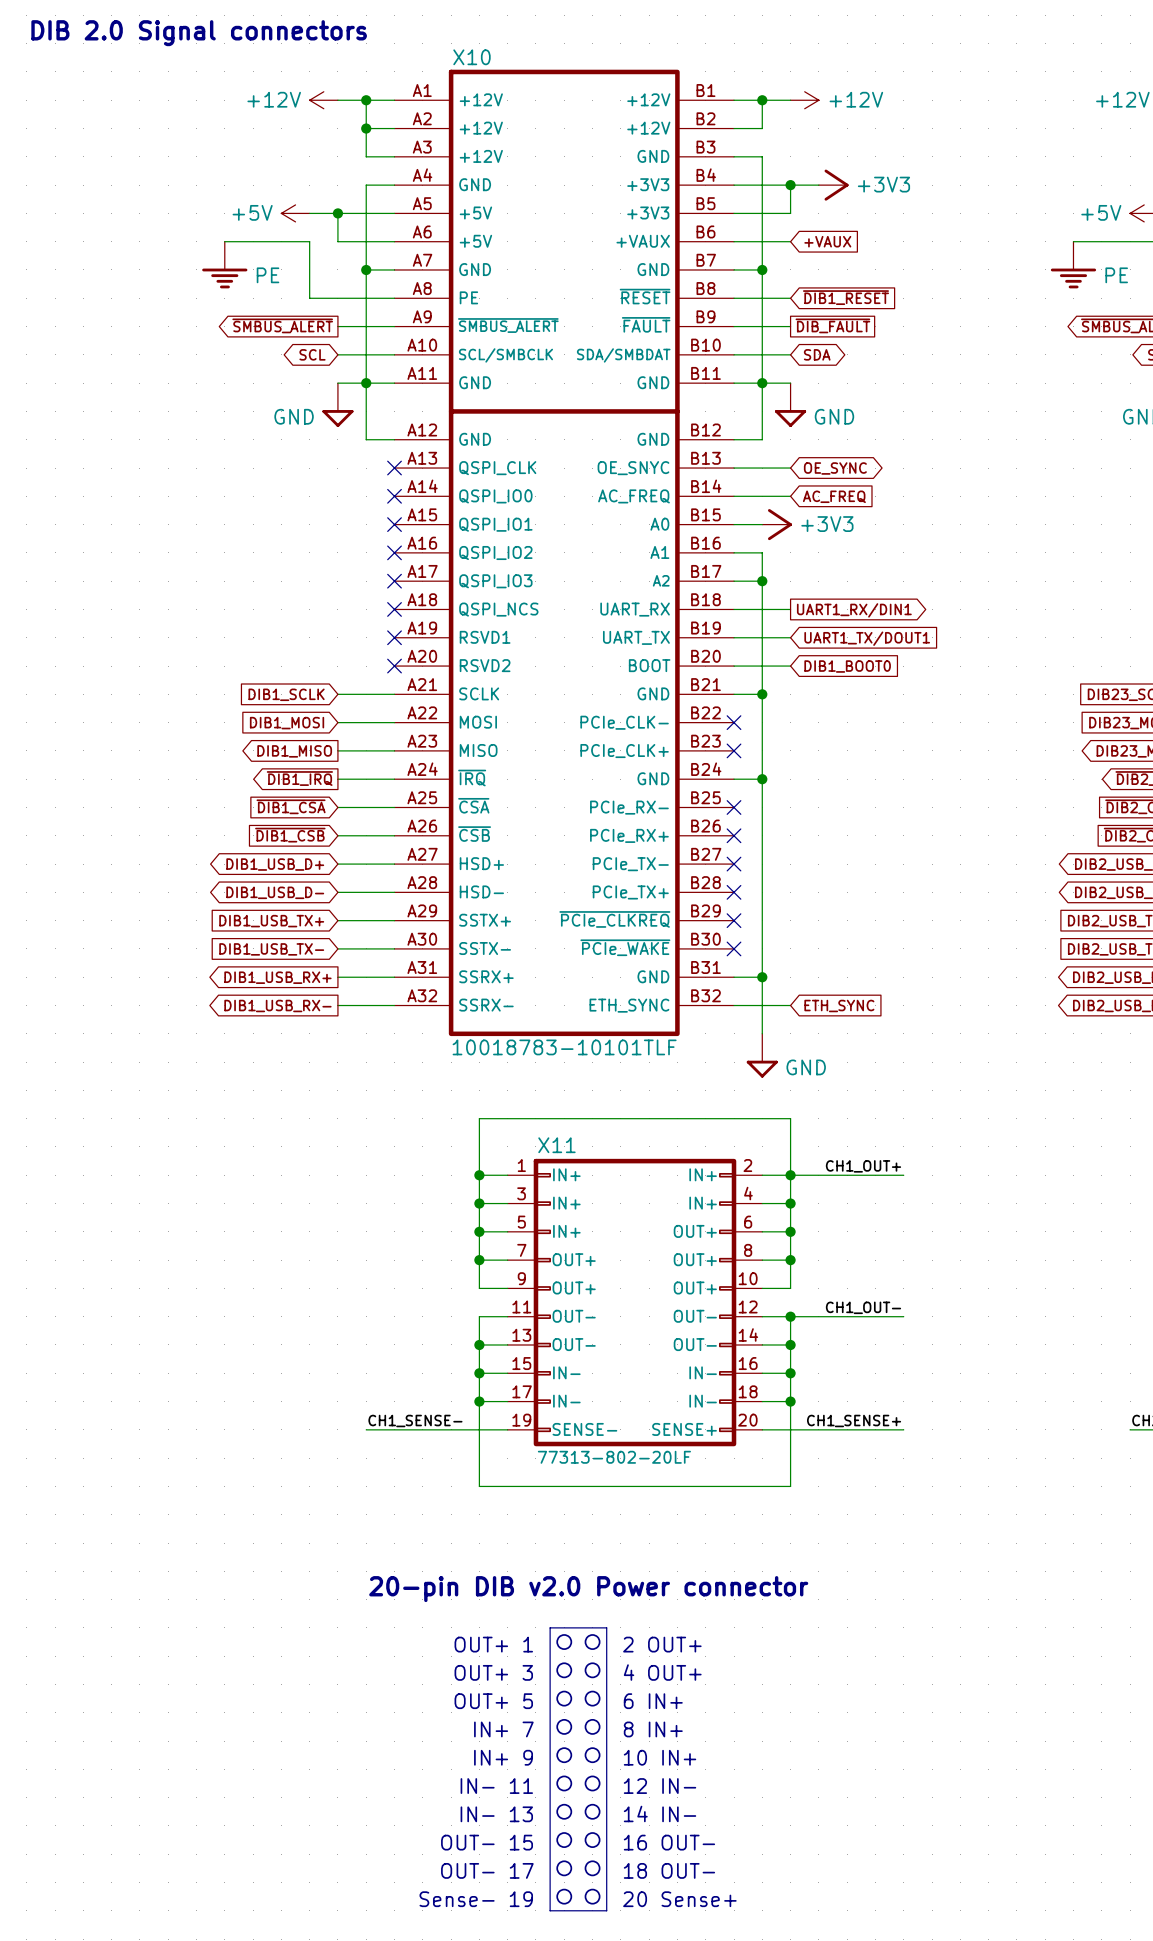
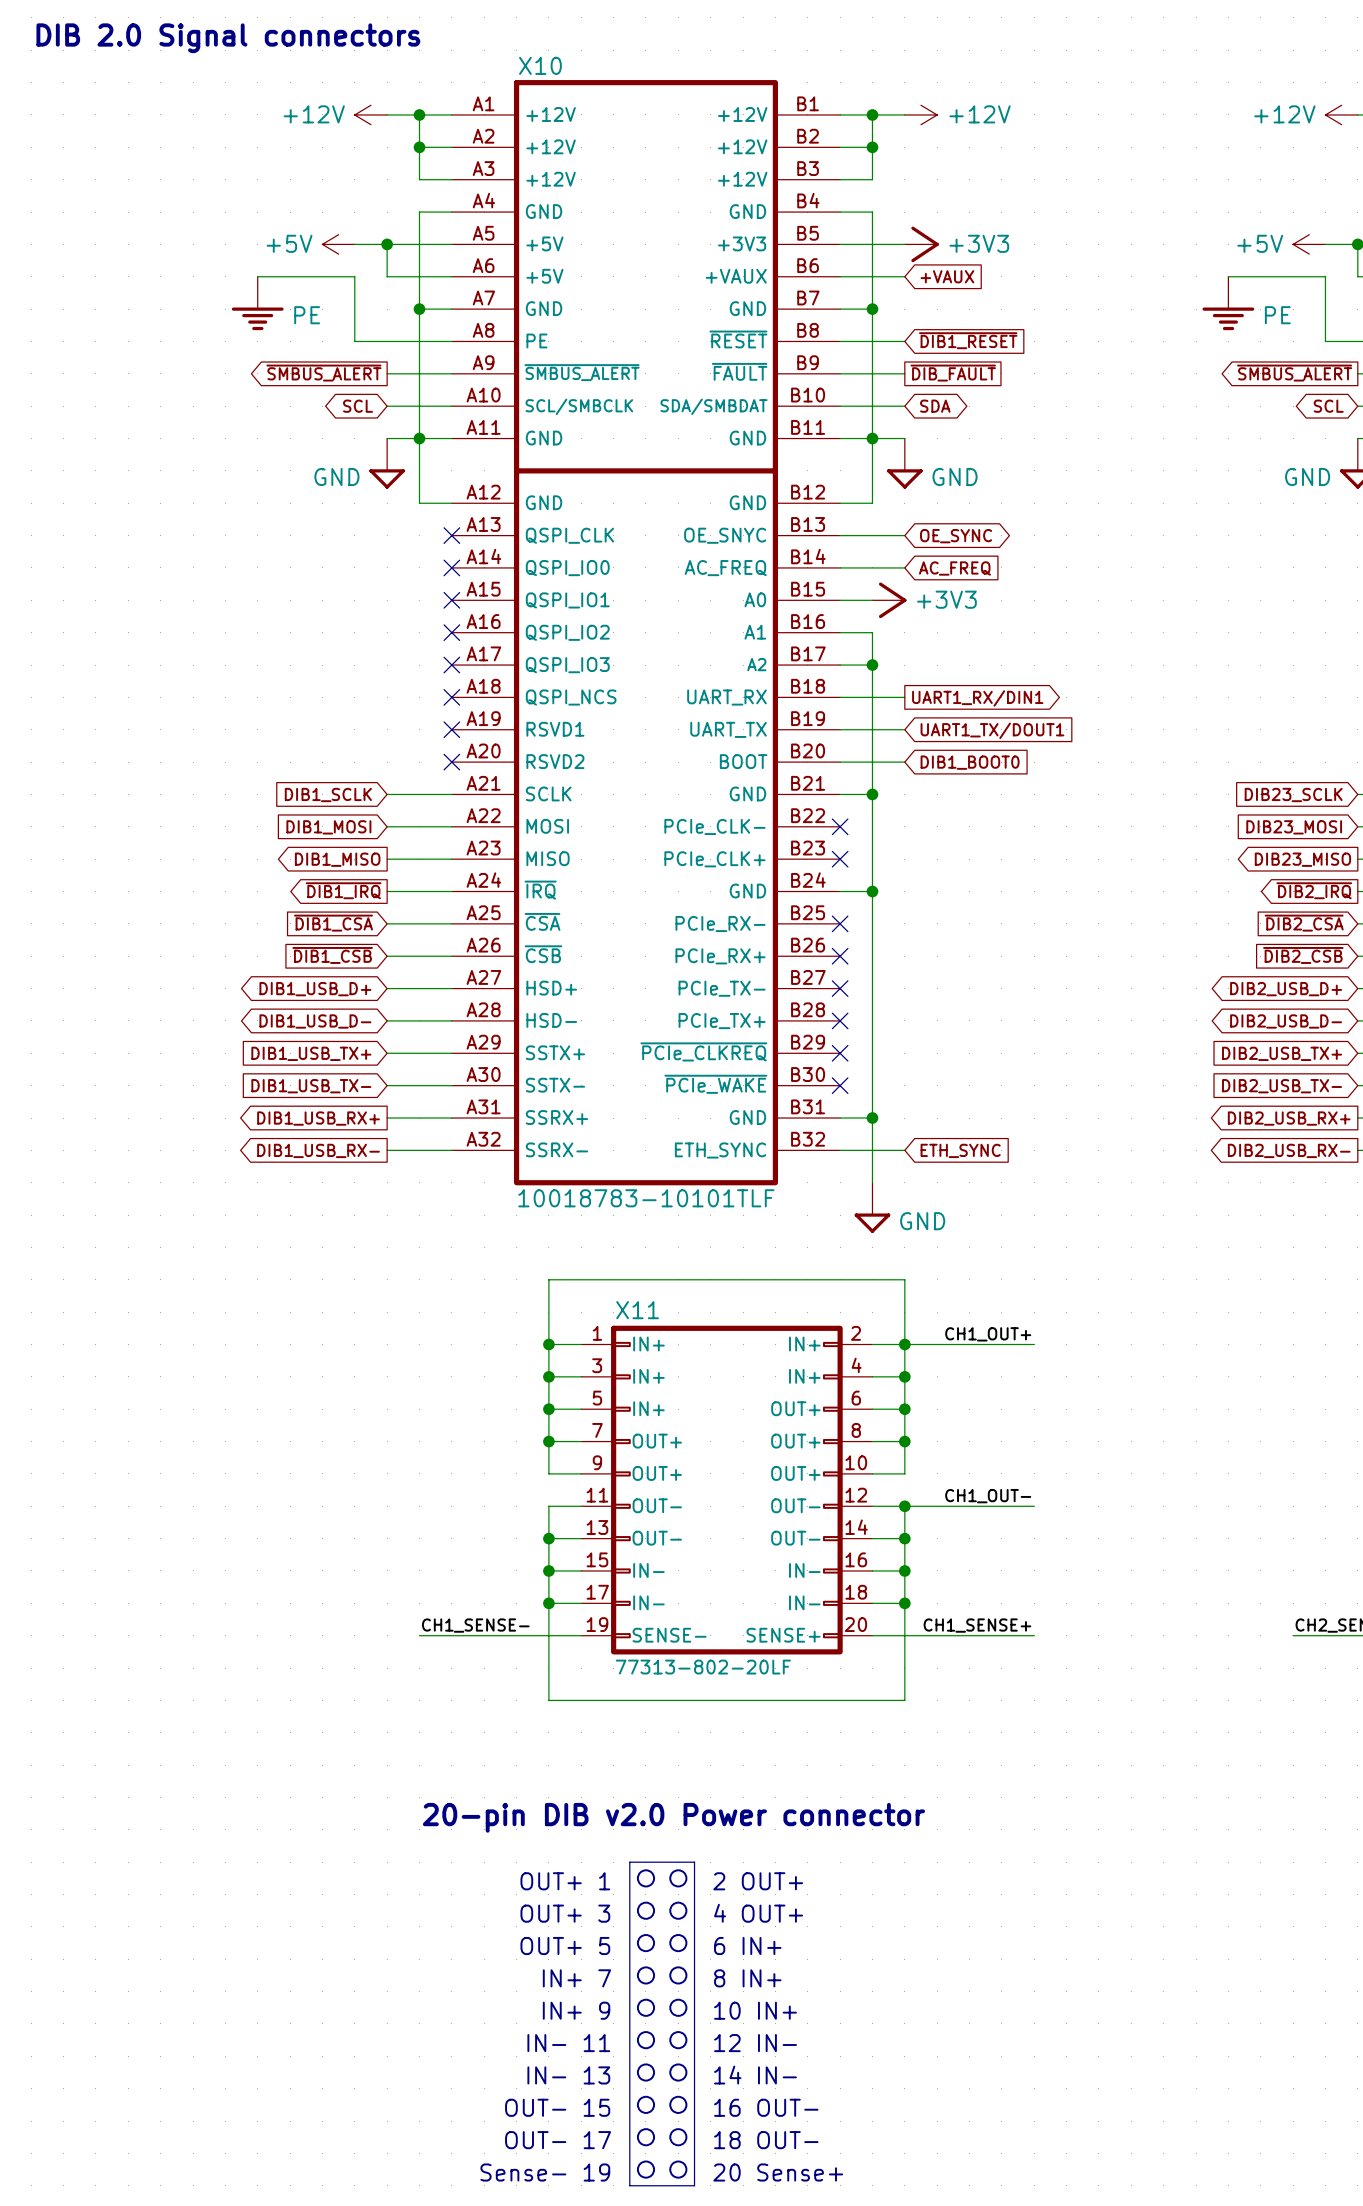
X10 pin name: GND (653, 156) -> +12V (742, 179)
wire: (762, 156) (762, 185) (818, 185) -> (872, 179) (872, 147)
X10 pin name: +3V3 (648, 184) -> GND (747, 211)
wire: (790, 185) (790, 213) -> none
junction position: (790, 185) -> (872, 147)
power symbol position: +3V3 (833, 185) -> +3V3 (921, 244)

